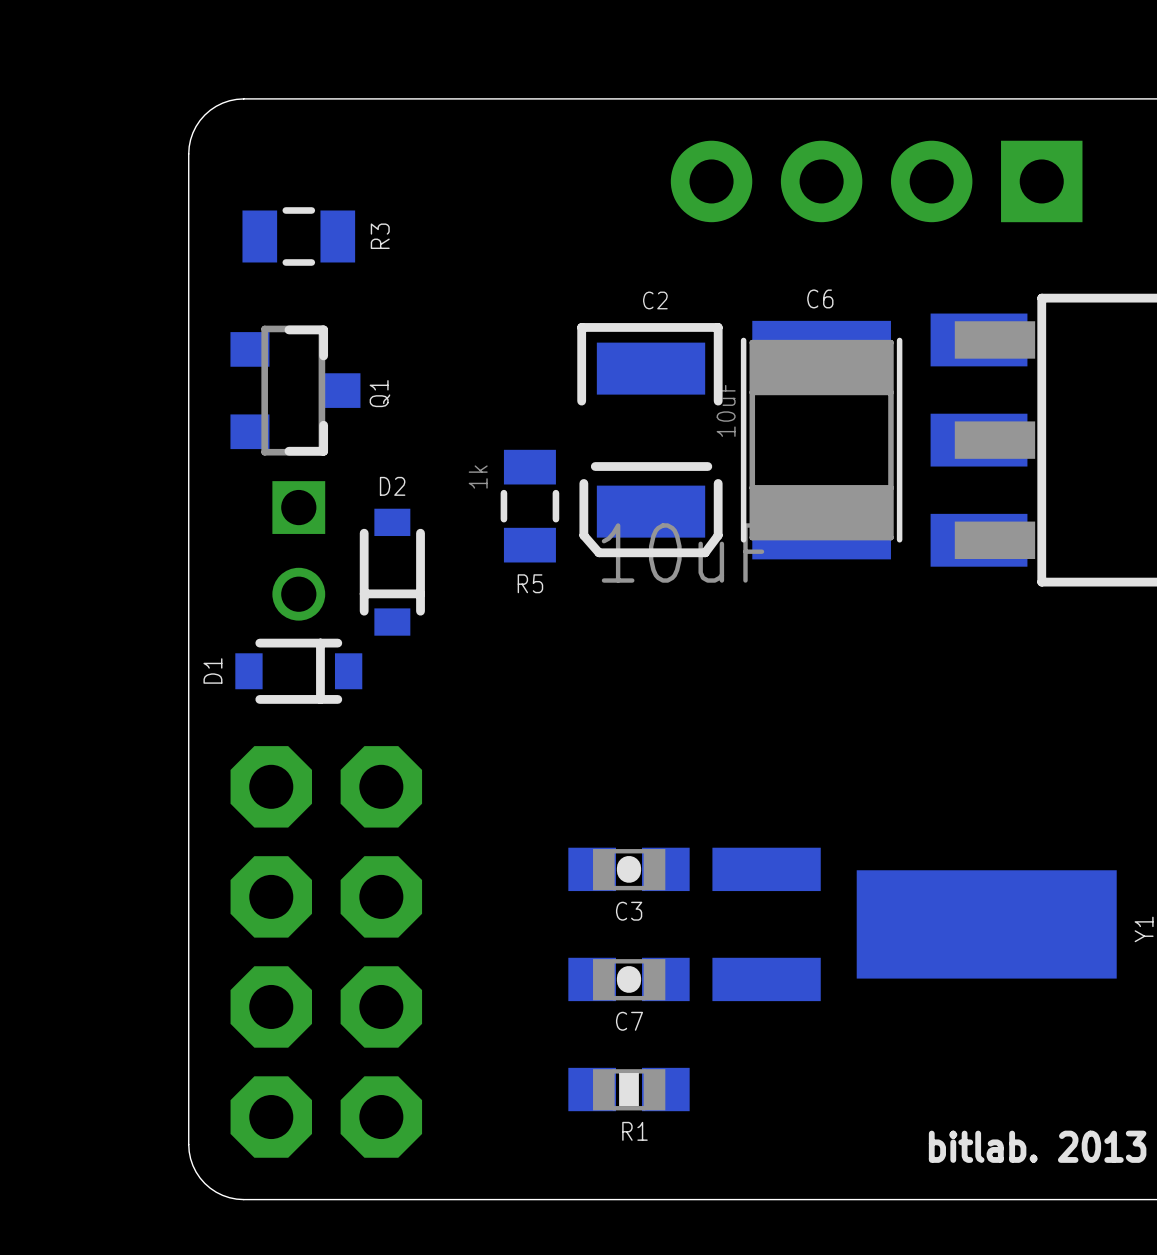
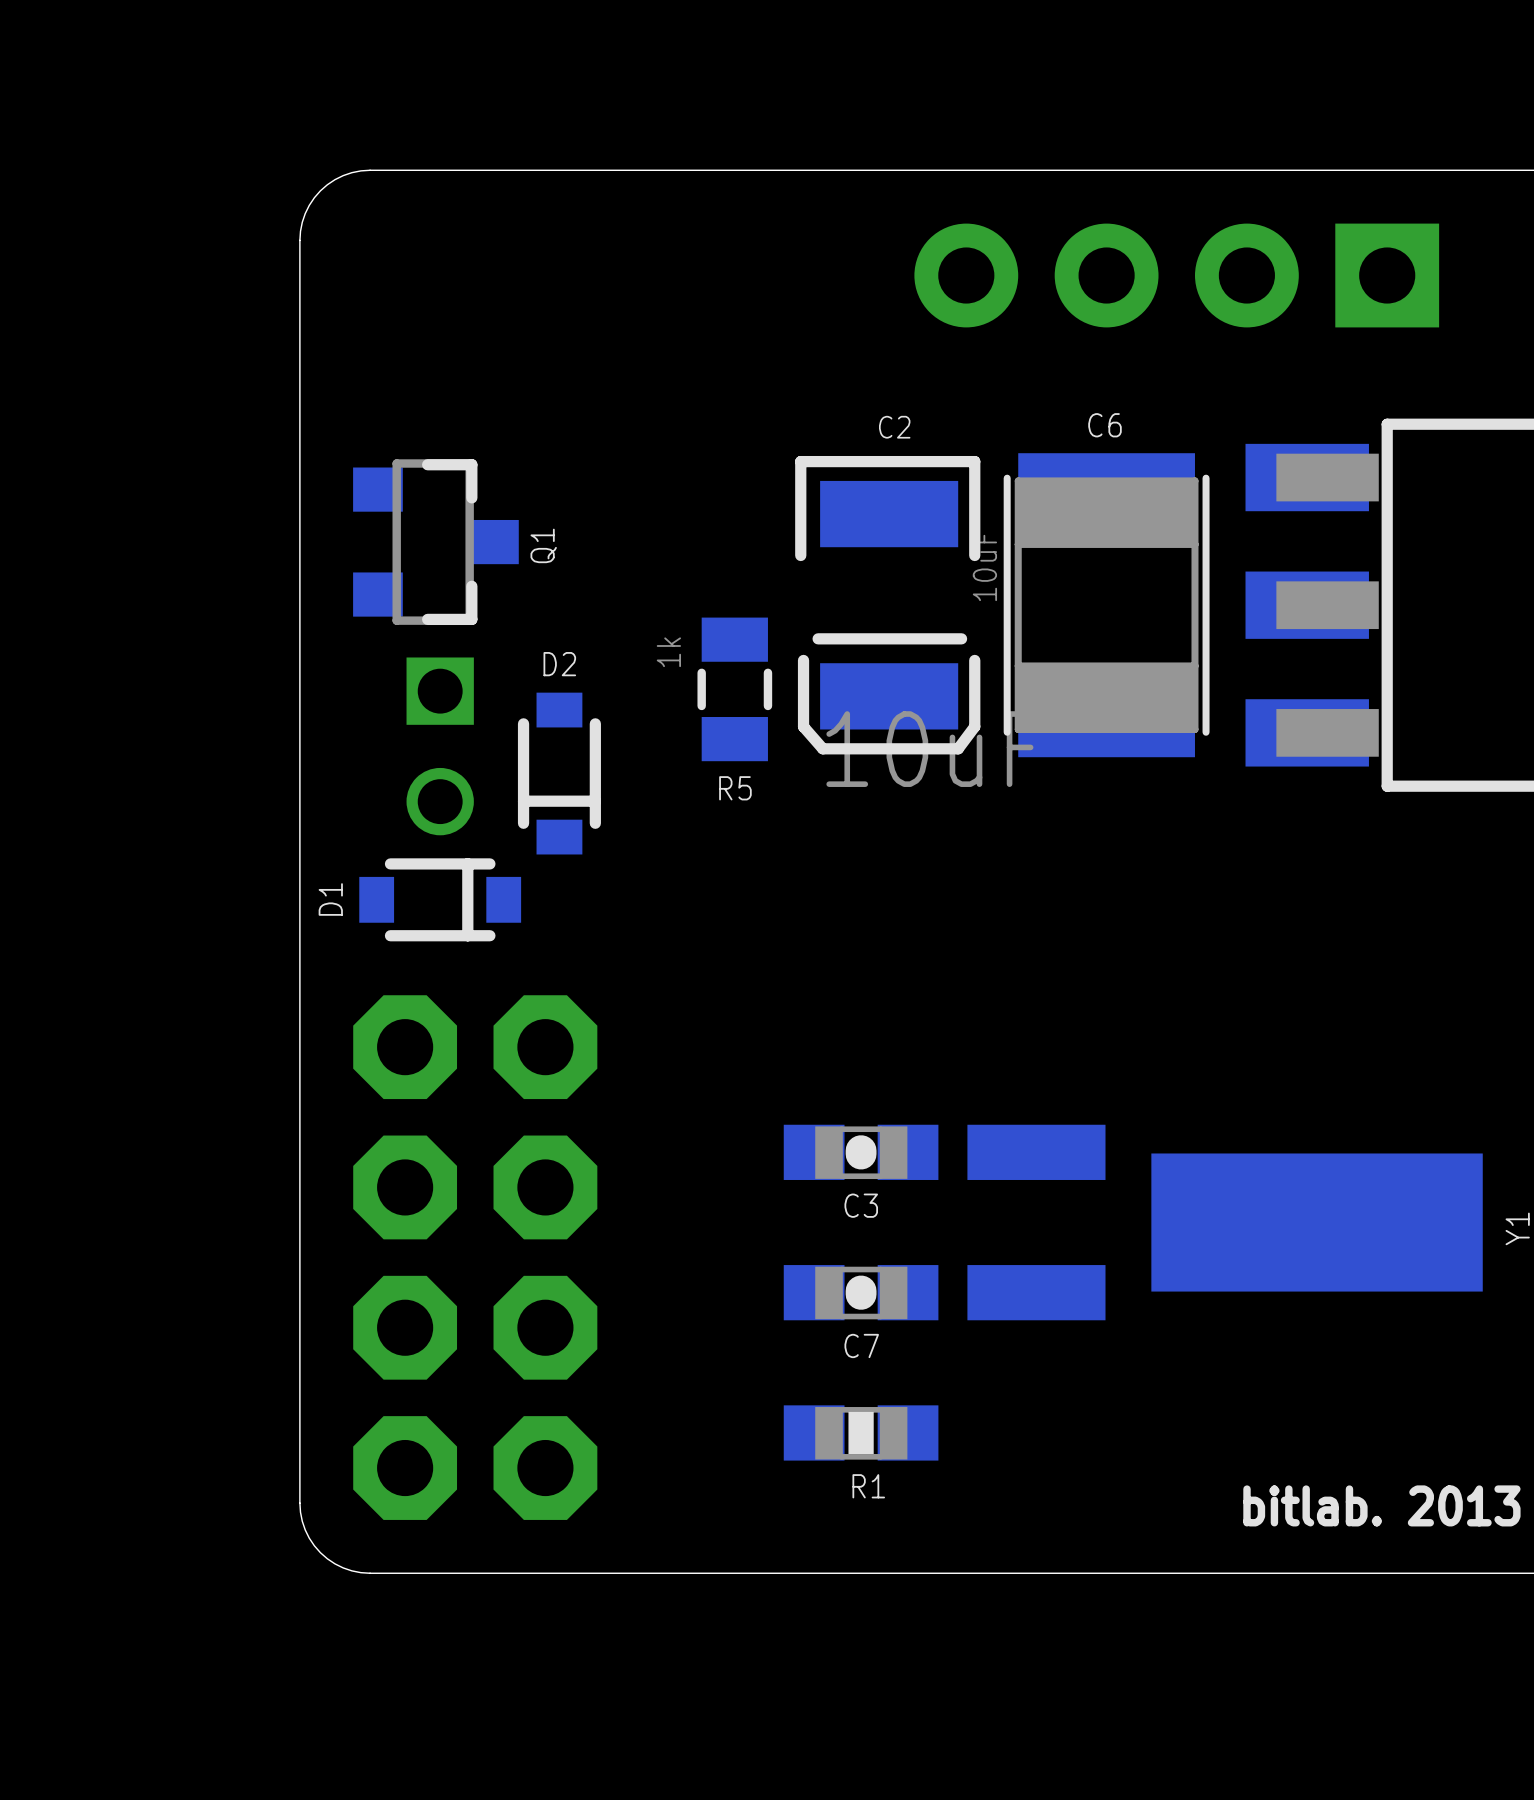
R3: (298, 236) -> none

